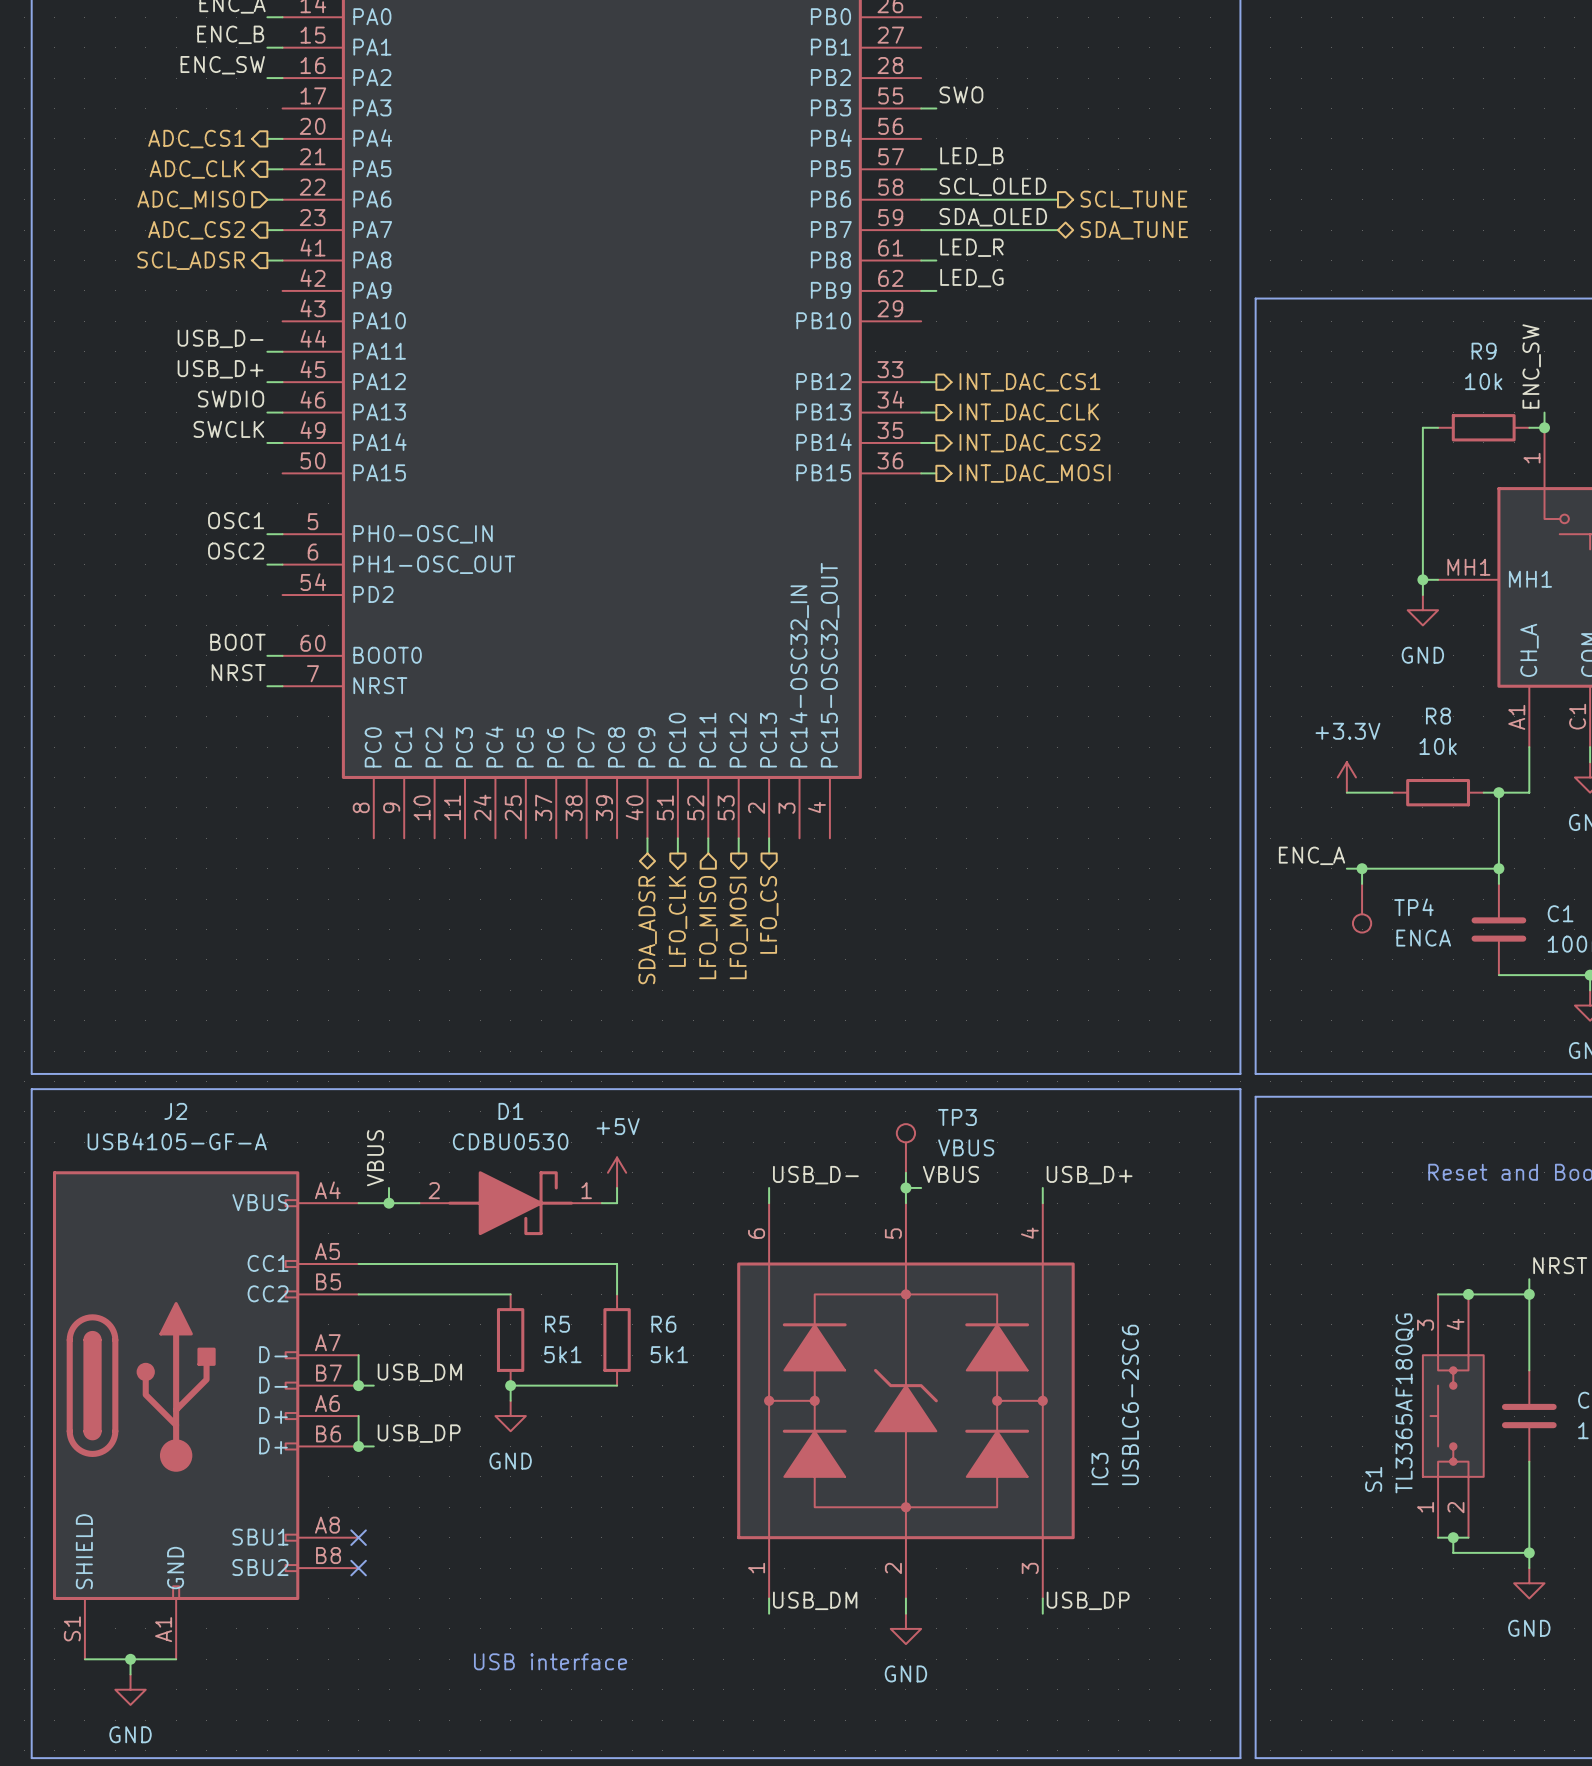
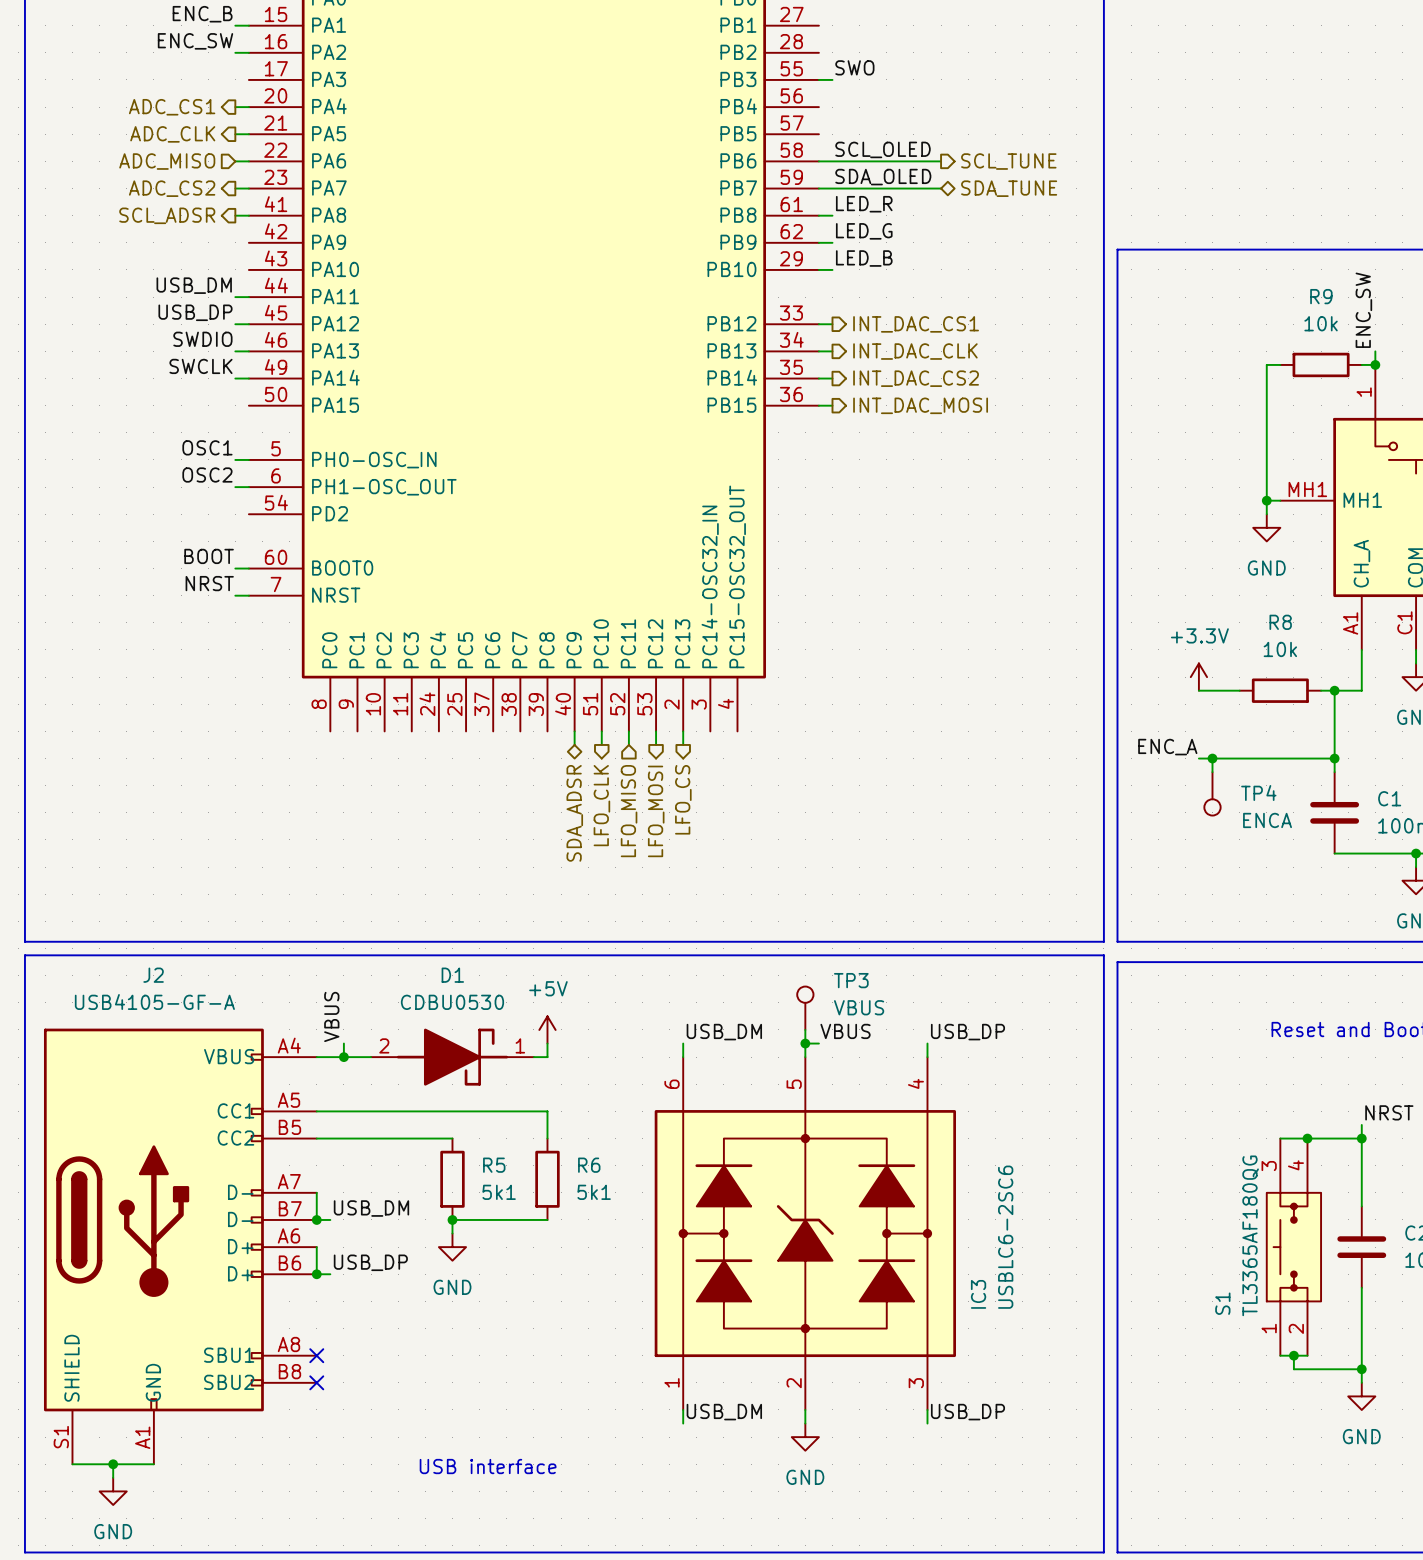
label position: LED_B (971, 156) -> LED_B (864, 258)
wire: (921, 169) (936, 169) -> (818, 269) (832, 269)
label: USB_D- (220, 338) -> USB_DM (194, 285)
label: USB_D+ (220, 369) -> USB_DP (195, 312)
label: USB_D- (815, 1175) -> USB_DM (724, 1032)
label: USB_D+ (1089, 1175) -> USB_DP (967, 1032)

